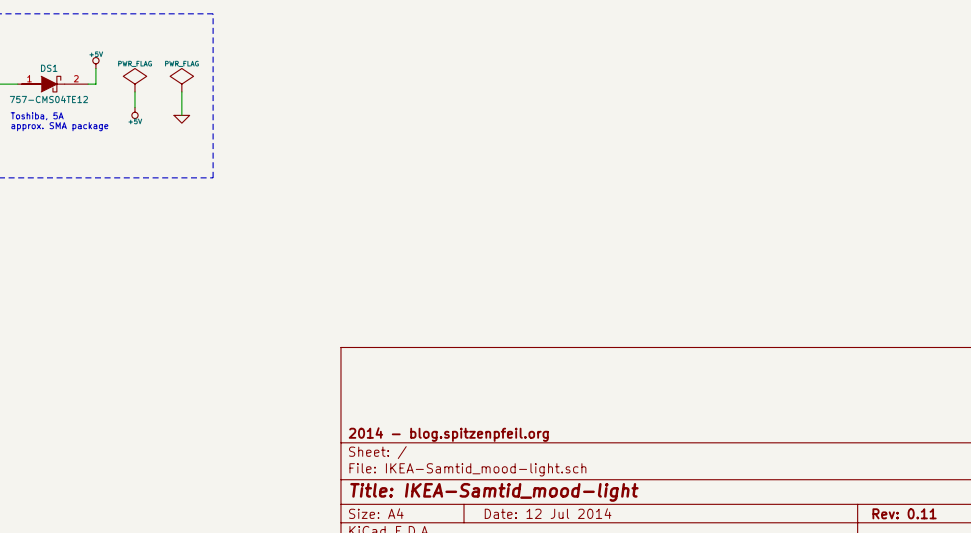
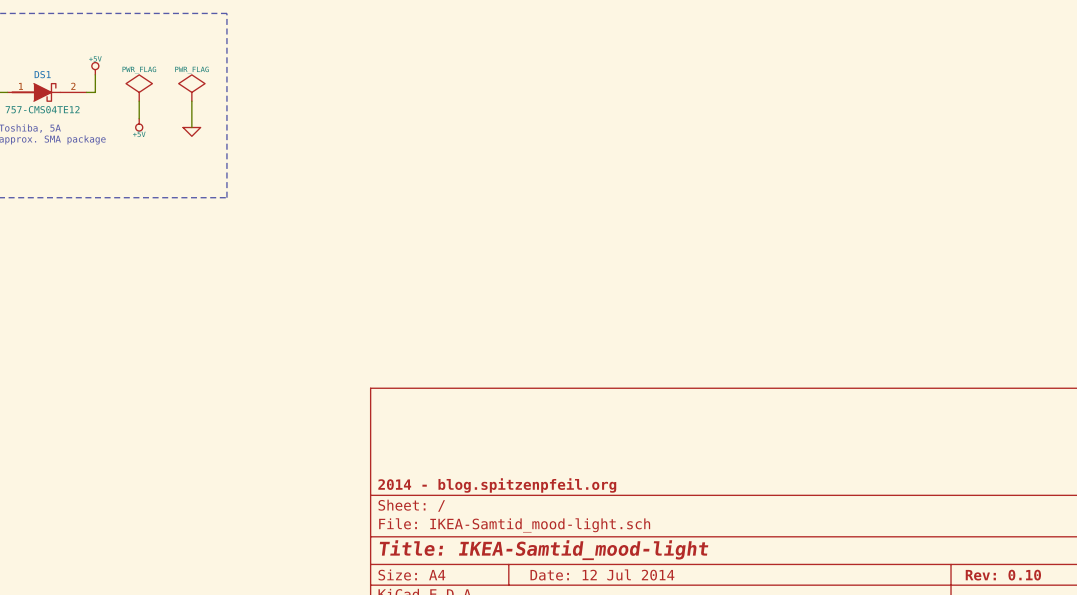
title block: Rev: 0.11 (904, 513) -> Rev: 0.10 (1003, 575)

